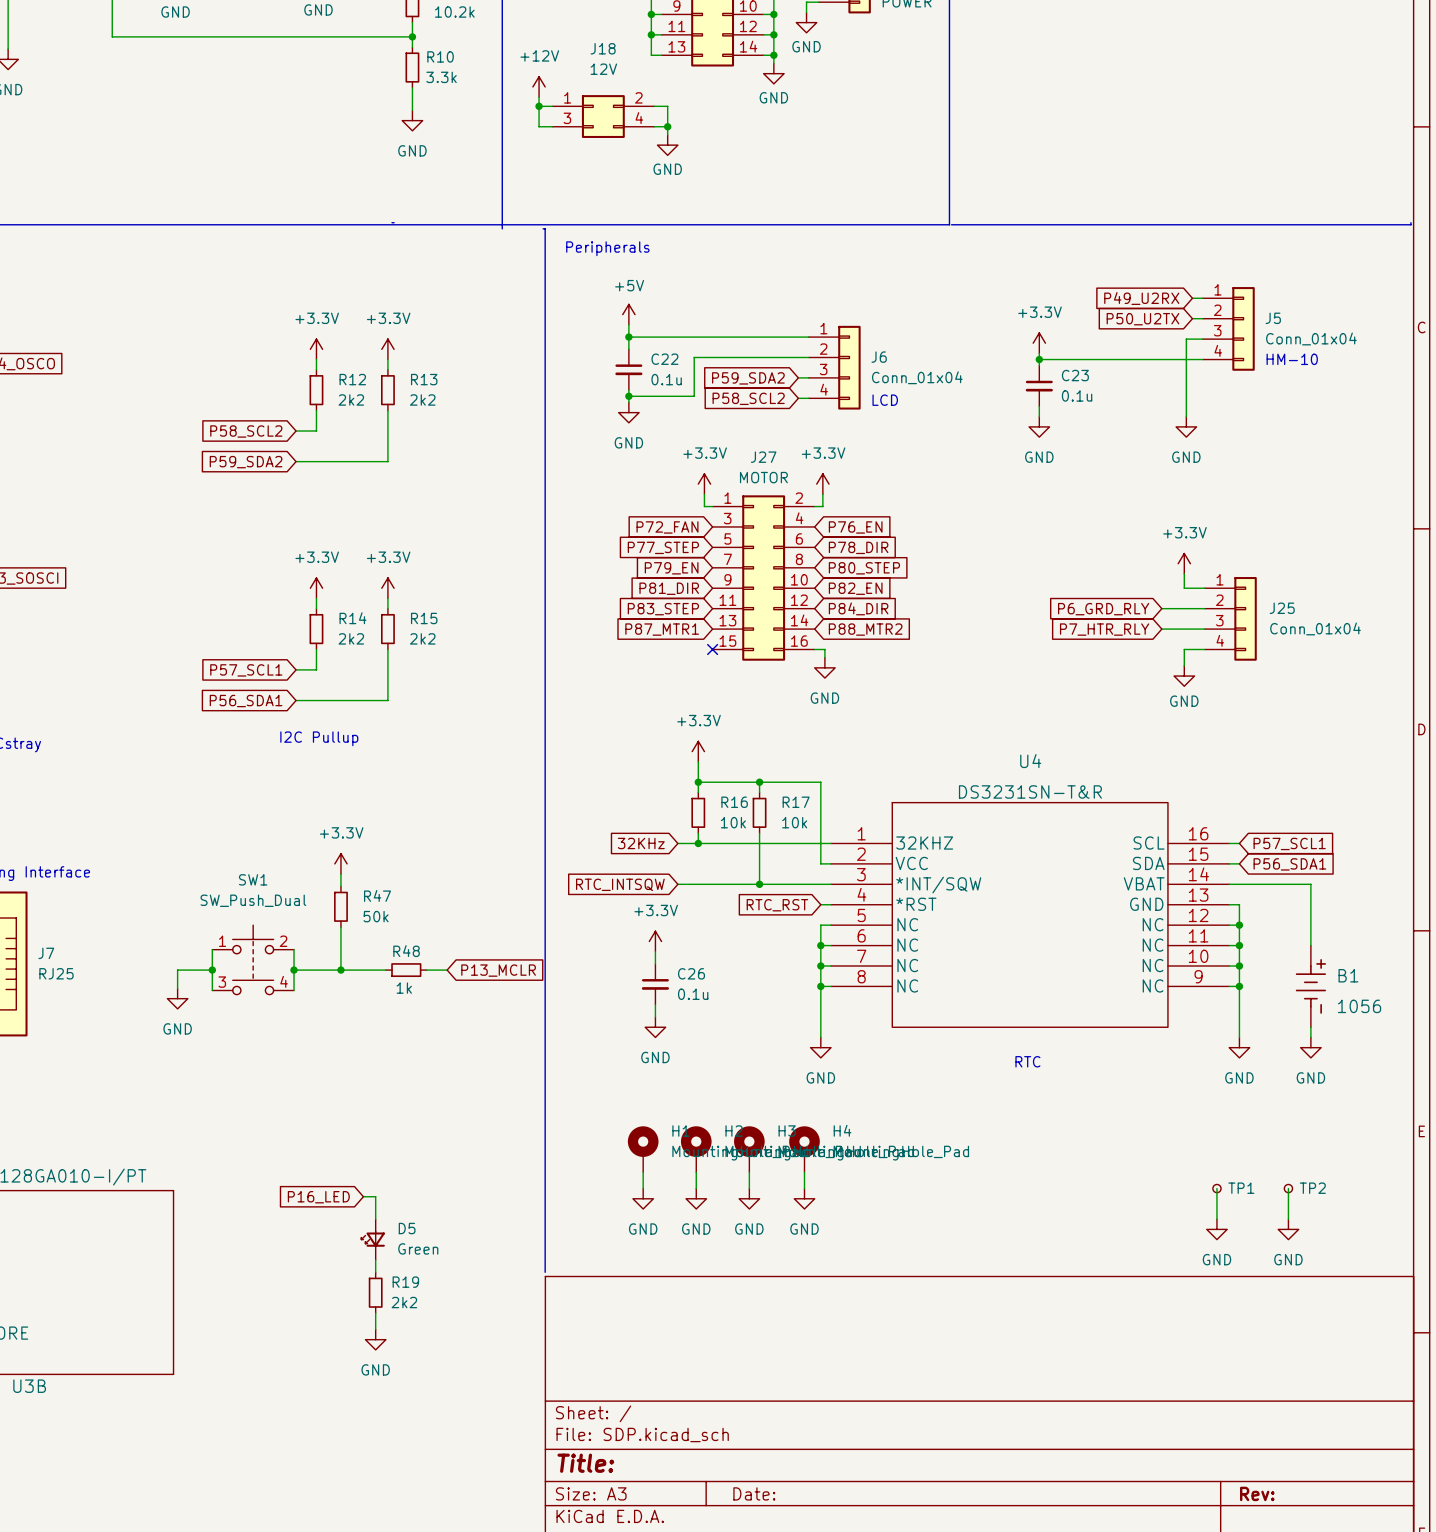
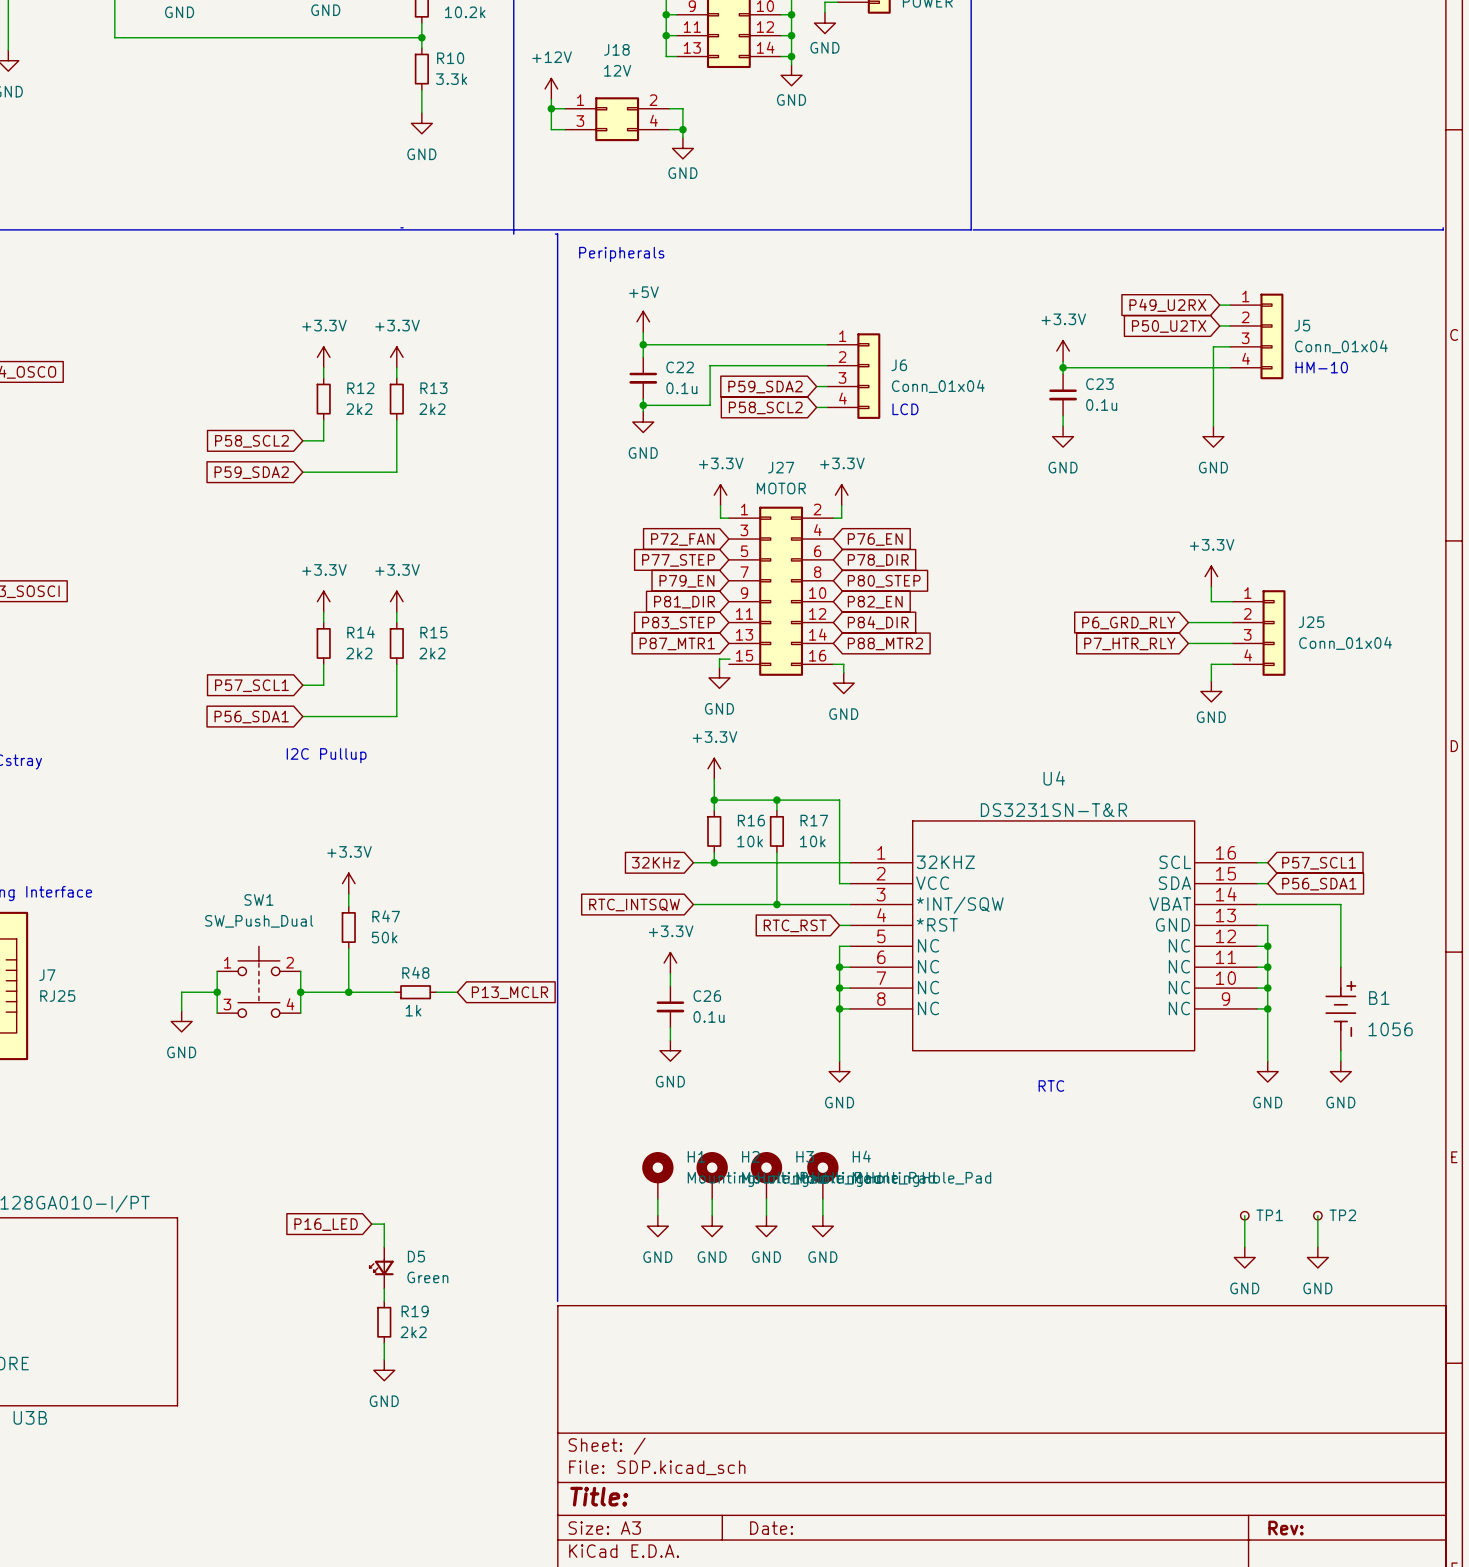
wire: none -> (729, 659) (719, 659) (719, 667)
no-connect mark: (712, 649) -> none
power symbol: none -> GND (719, 677)

